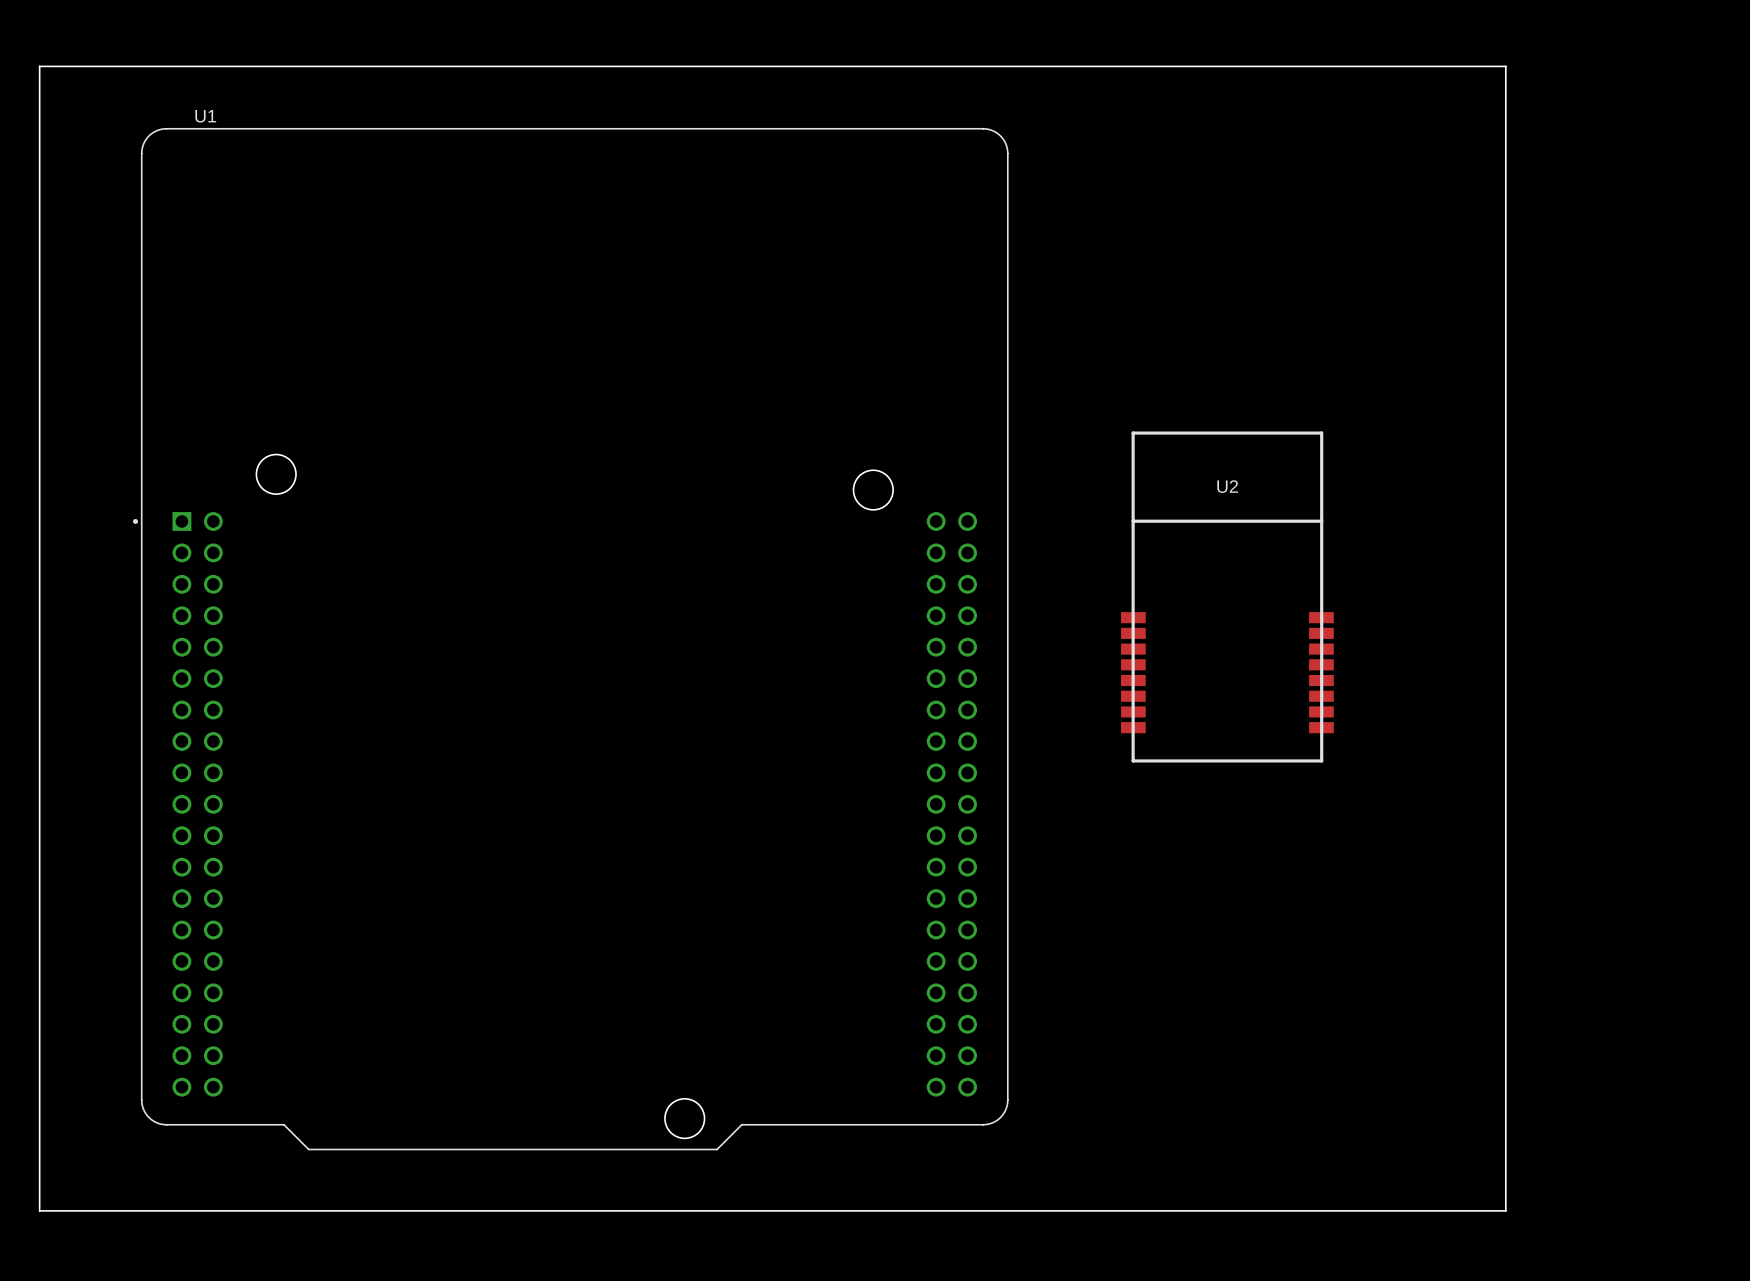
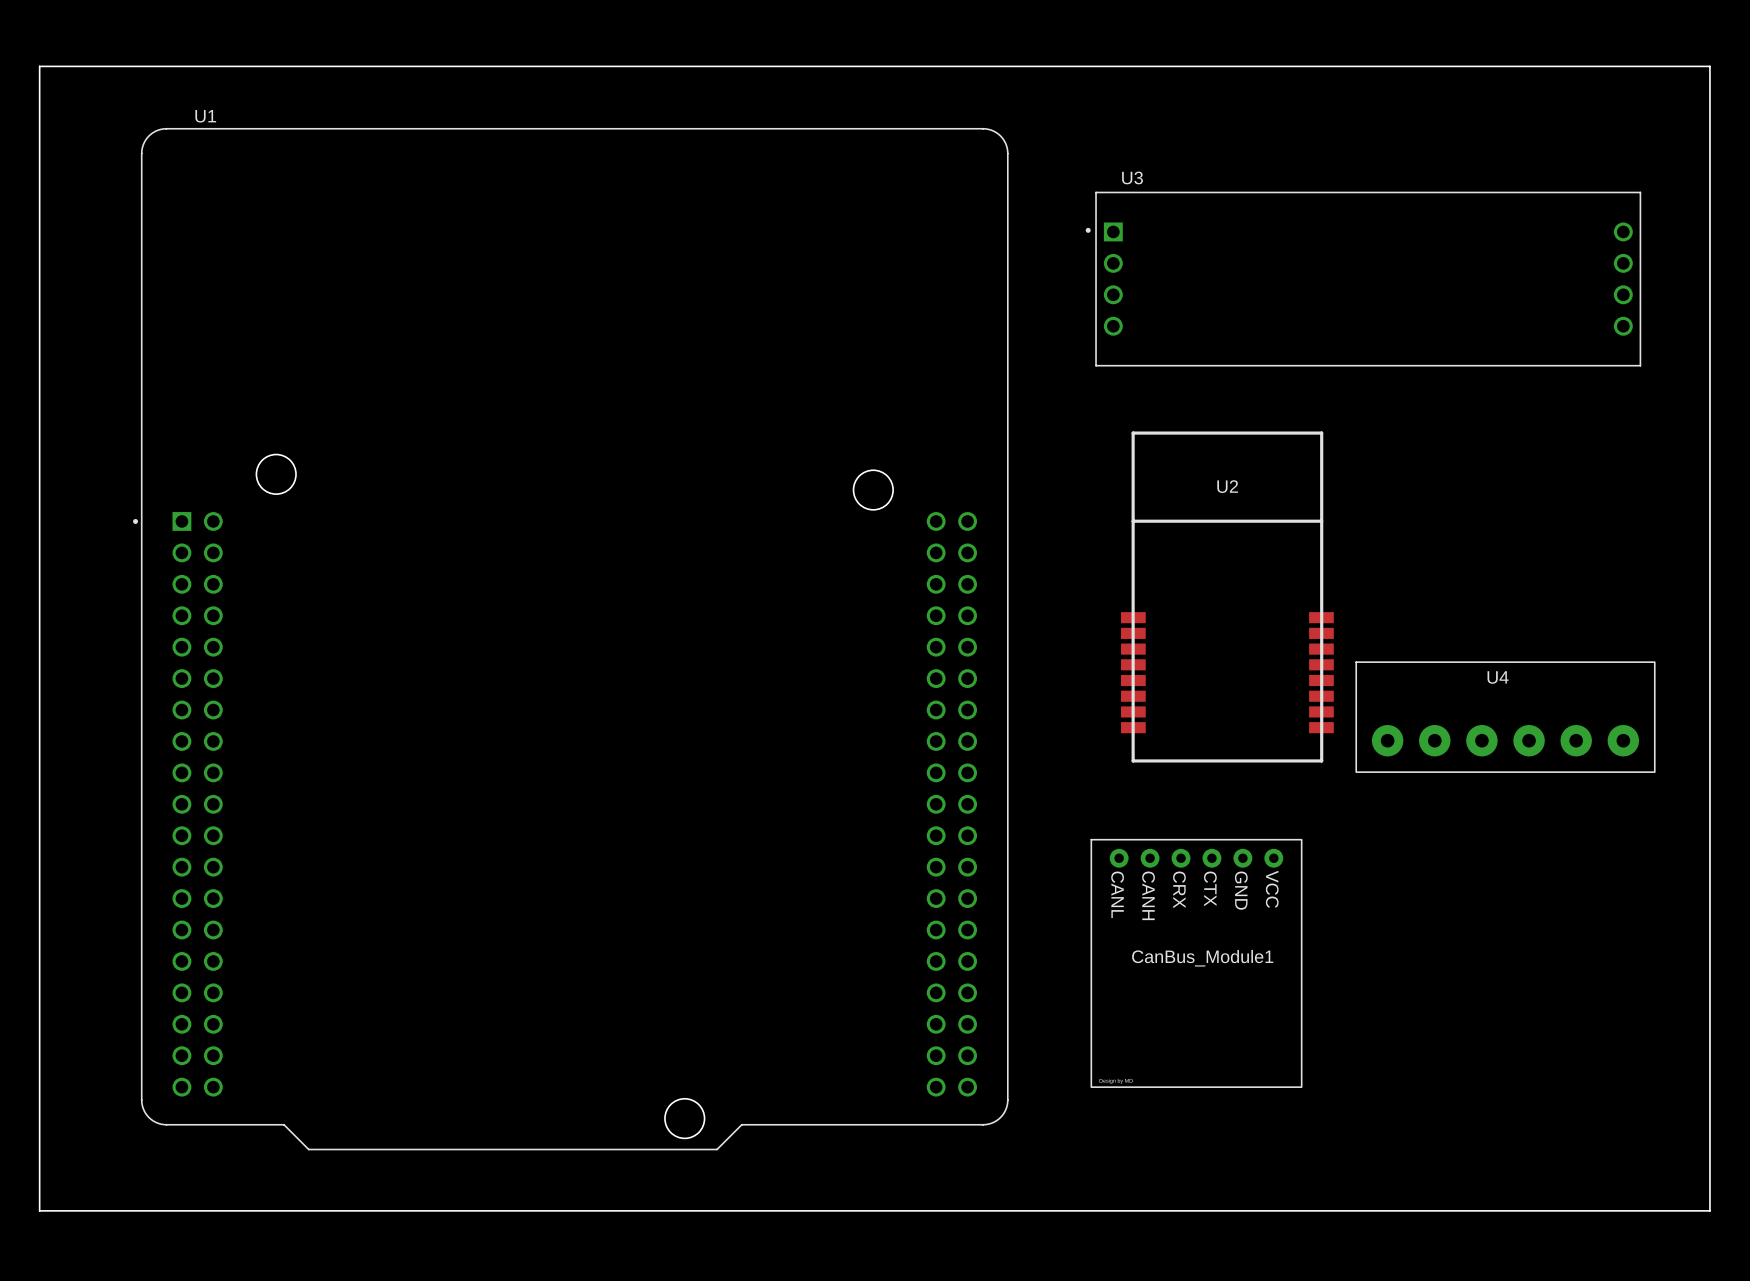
board edge: (1505, 66) (1505, 1210) -> (1505, 66) (1709, 66) (1709, 1210) (1505, 1210)
U3: none -> (1363, 279)
U4: none -> (1505, 717)
CanBus_Module1: none -> (1196, 963)

